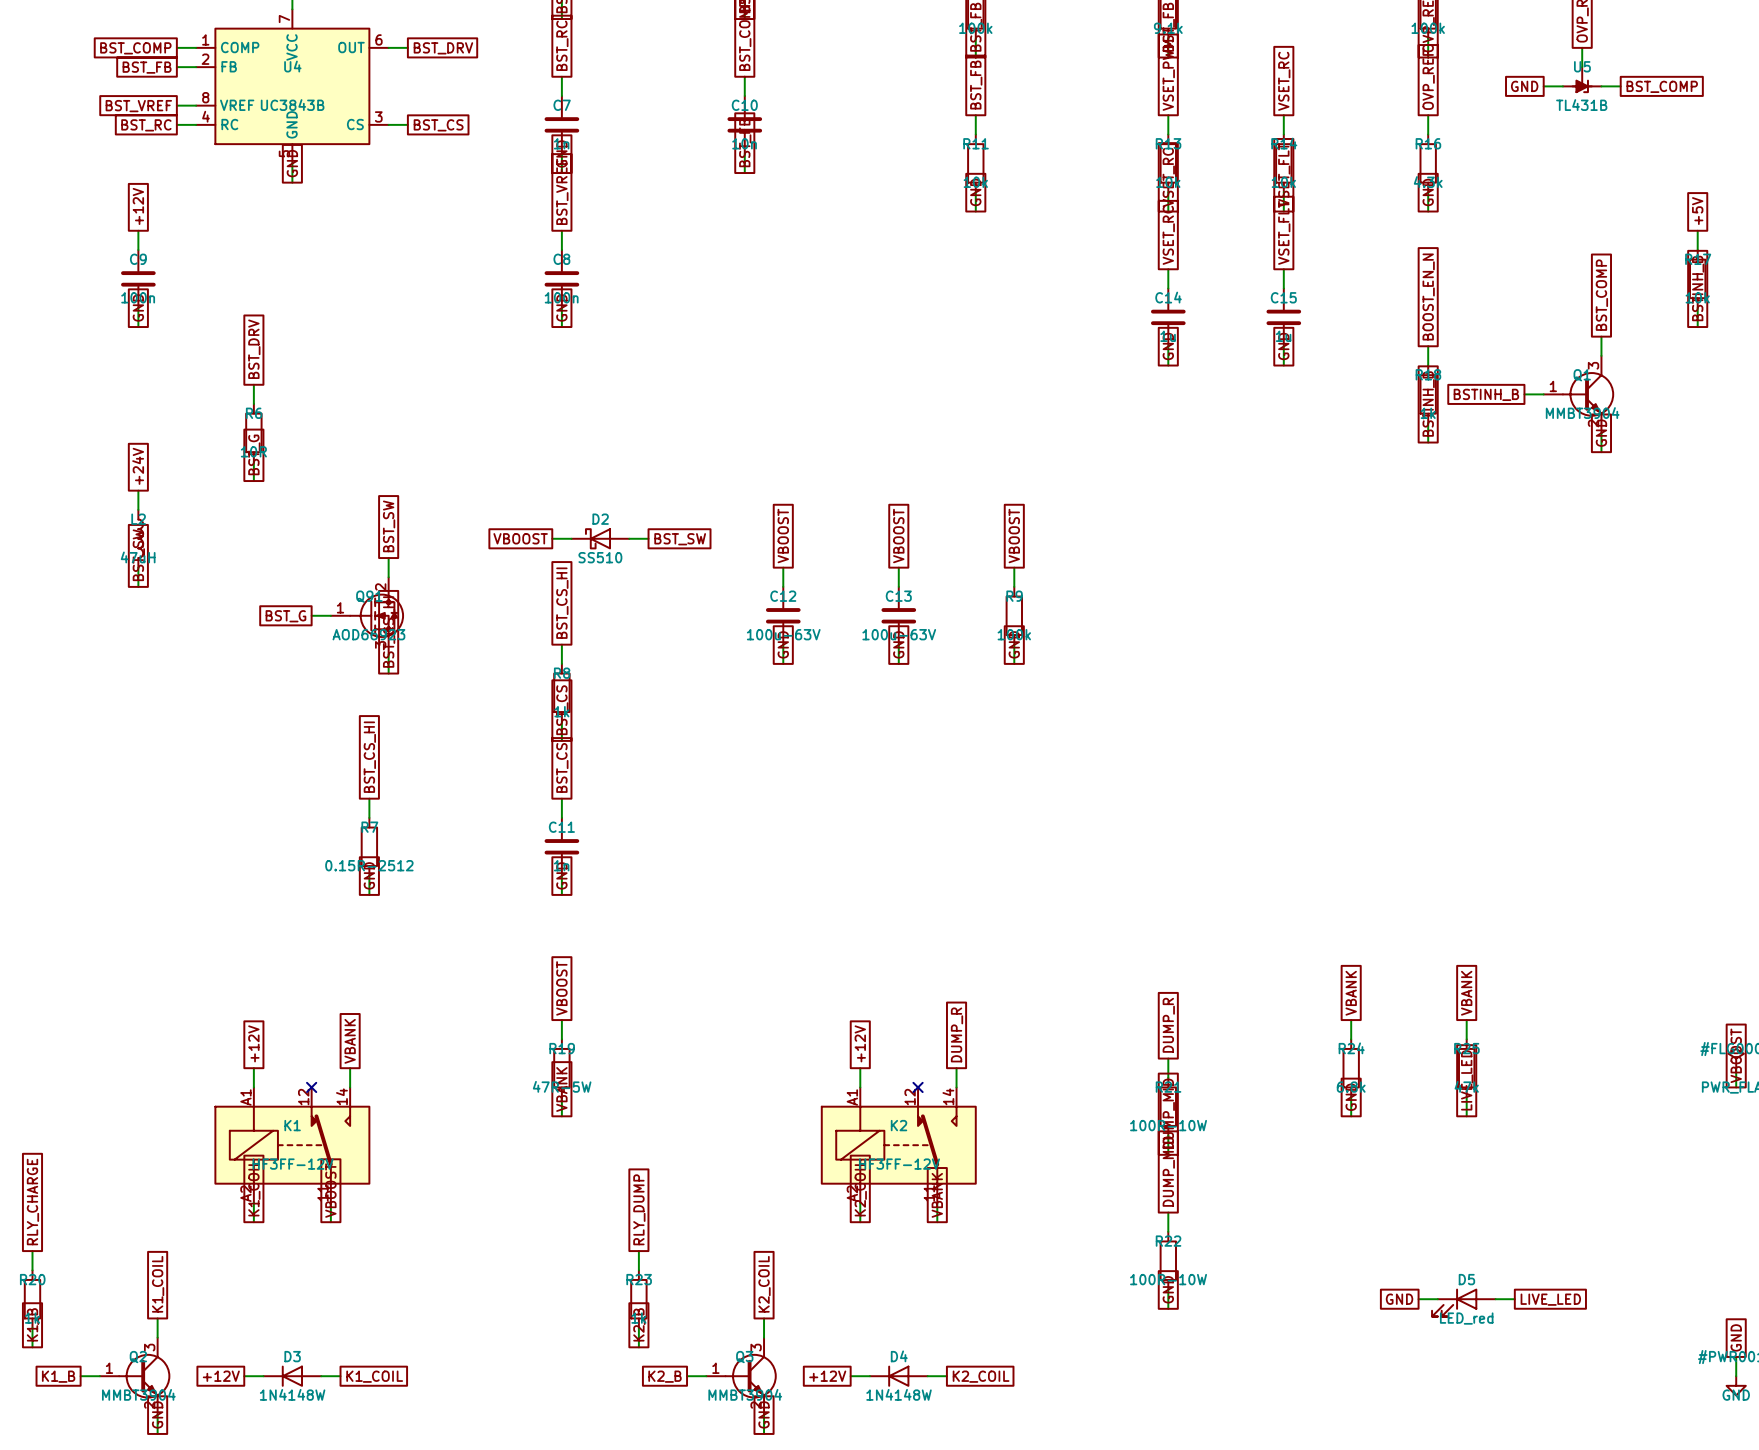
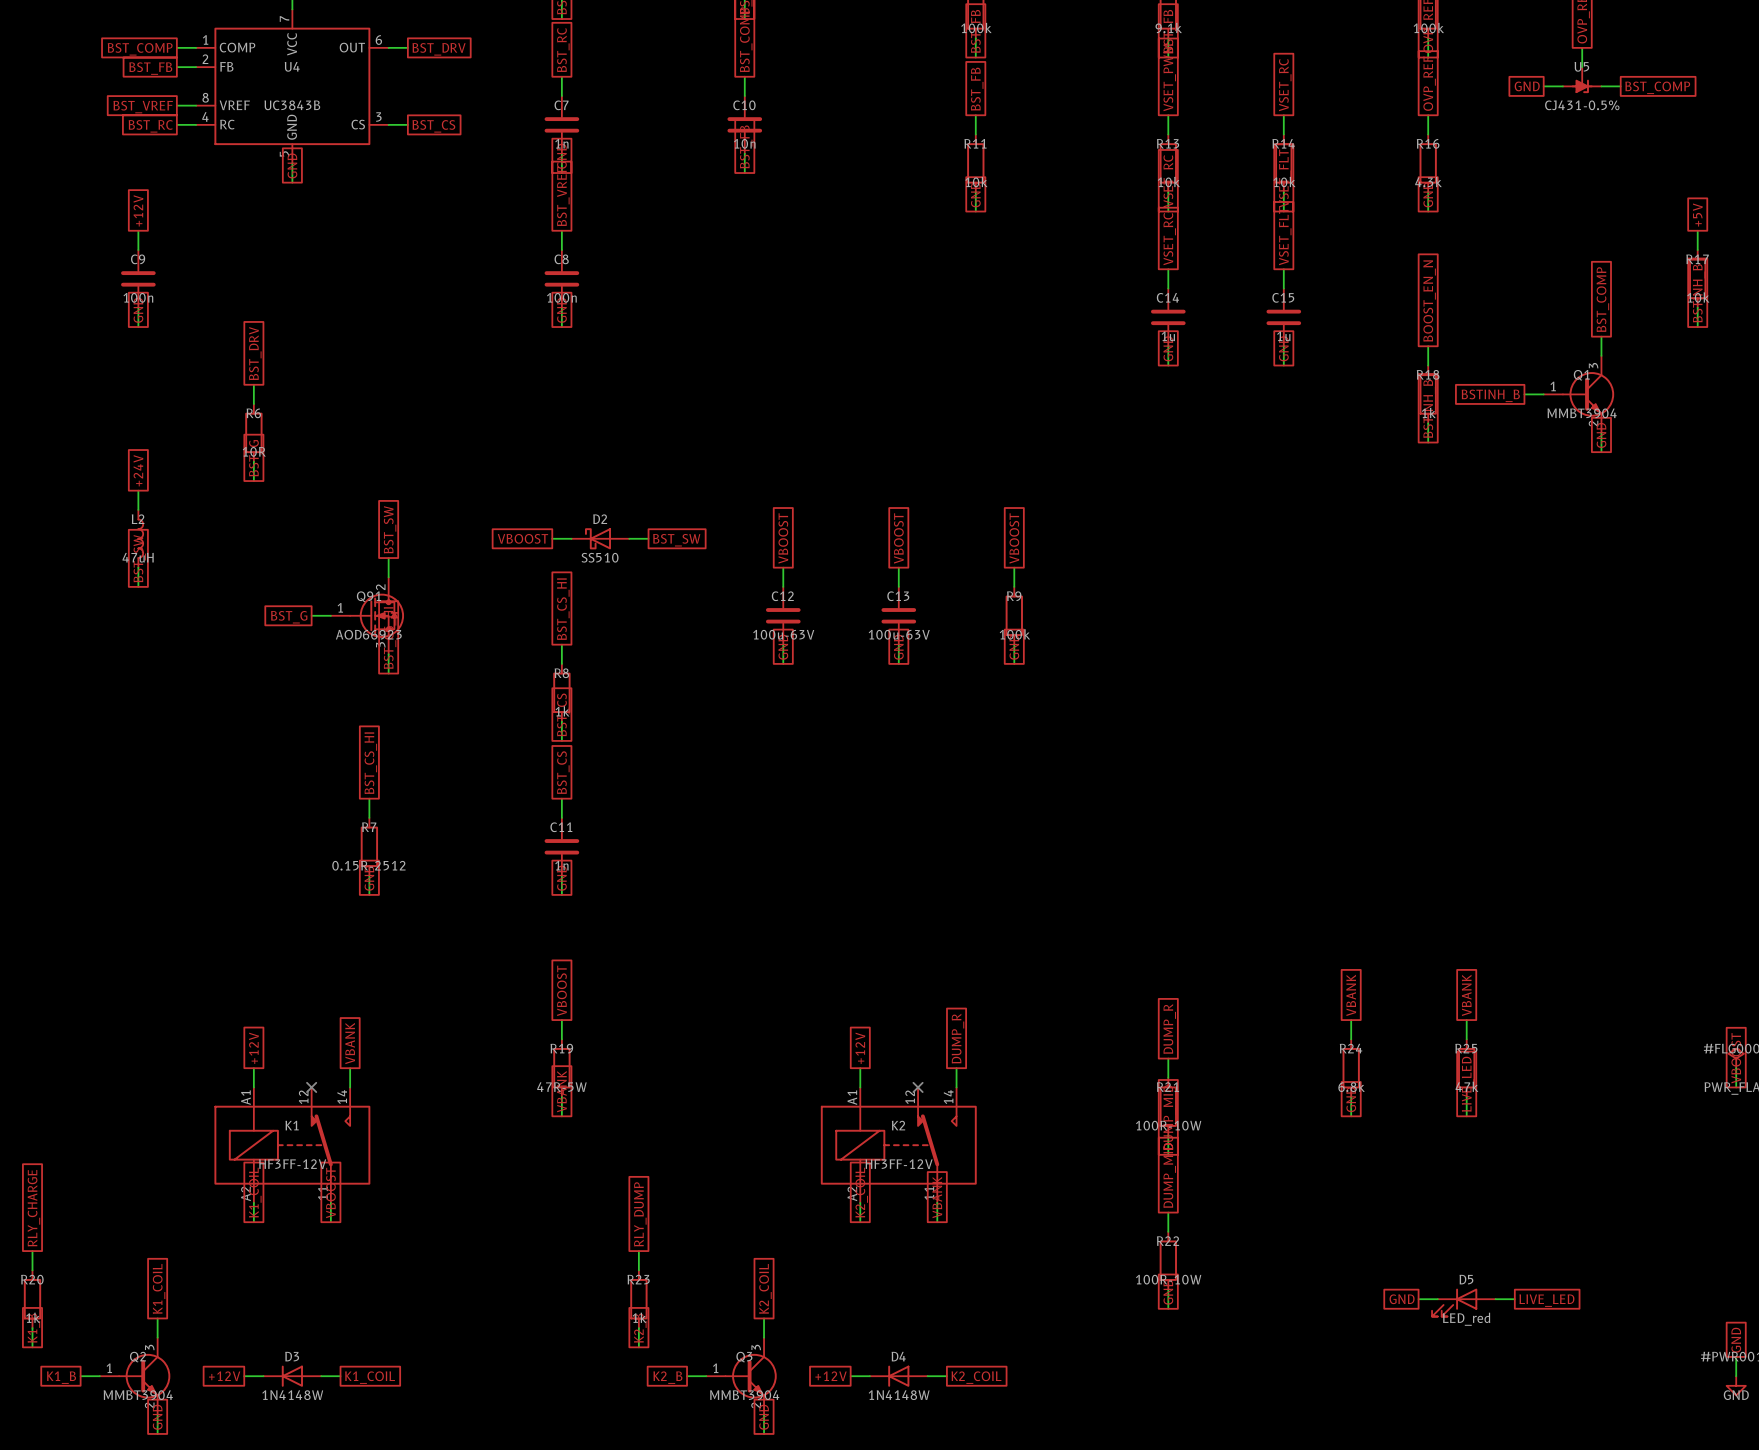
U5 value: TL431B (1581, 105) -> CJ431-0.5% (1582, 105)

